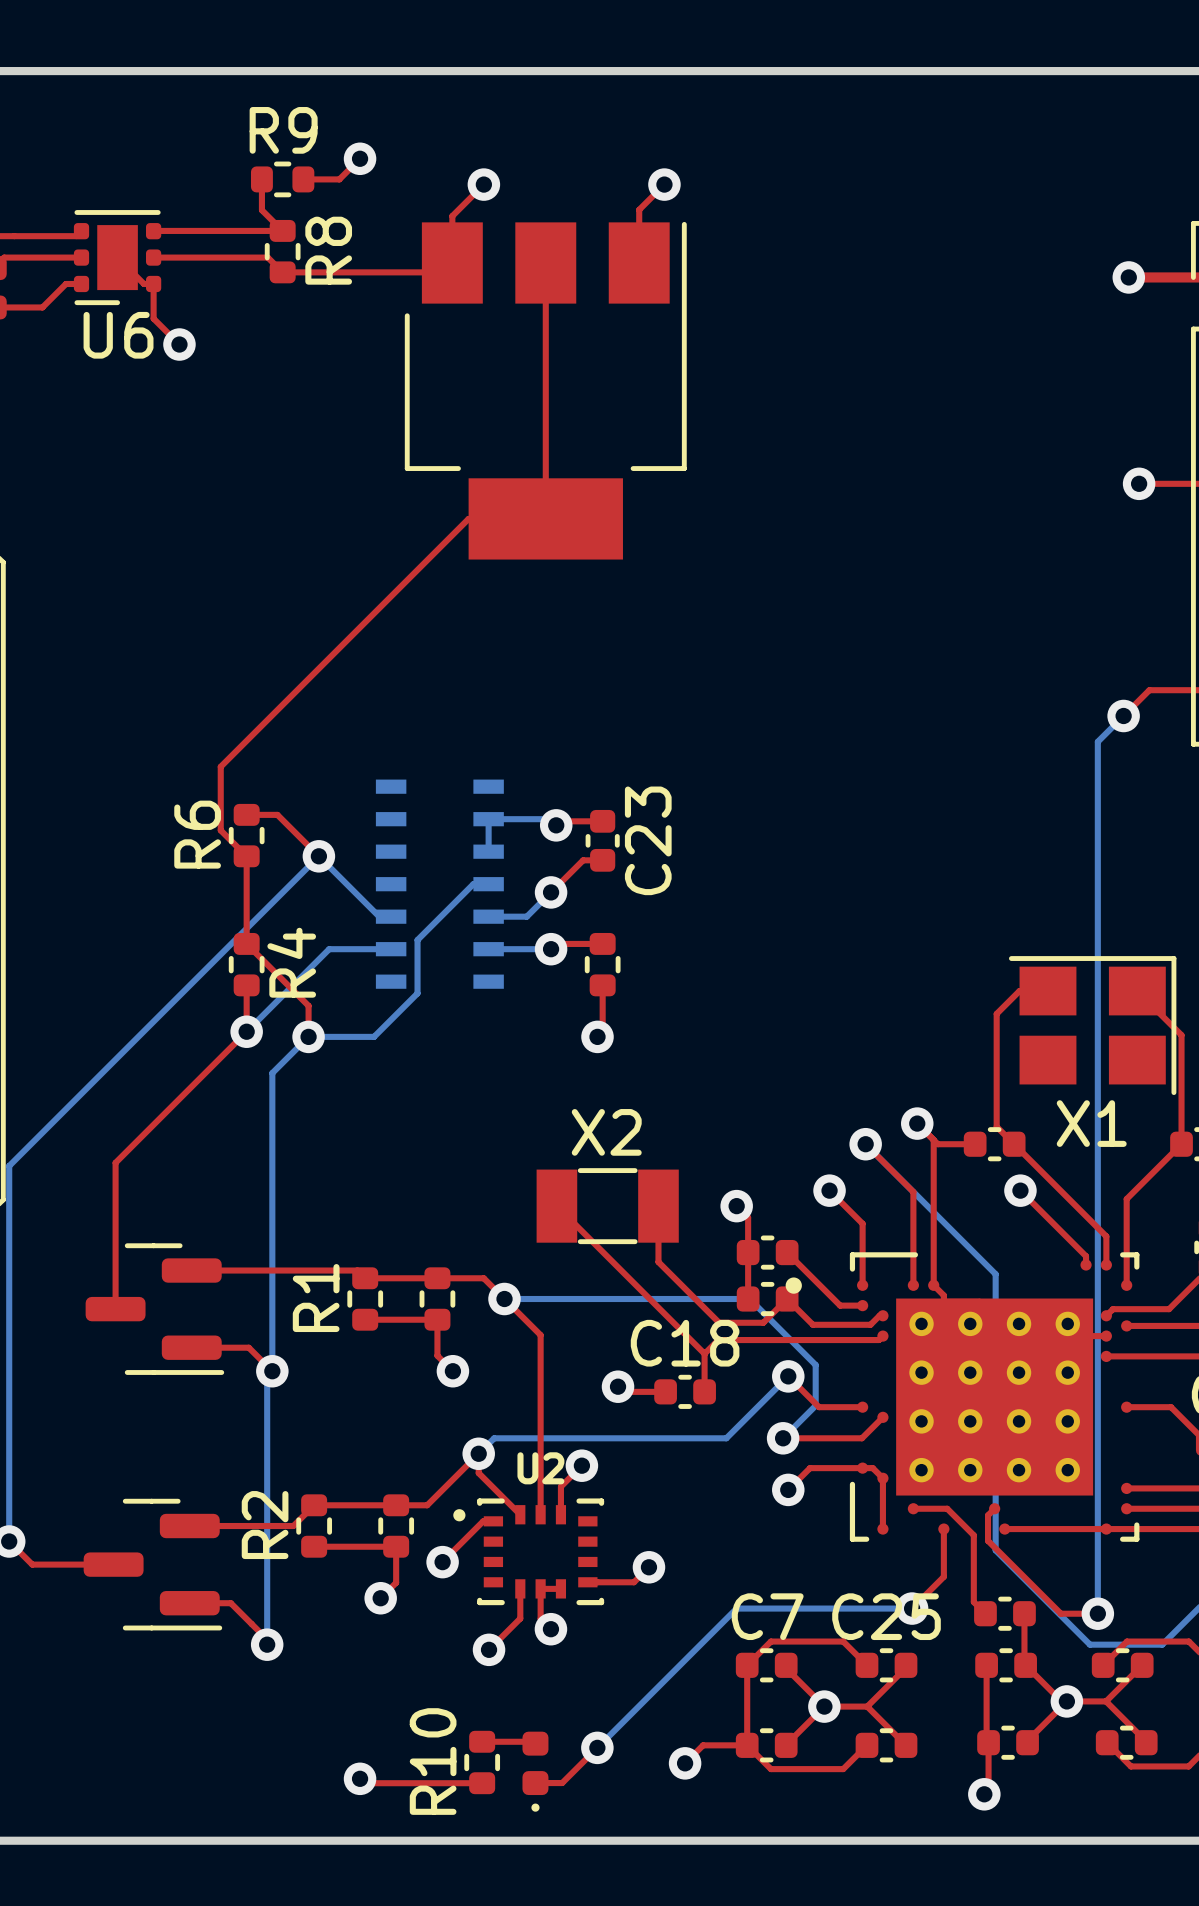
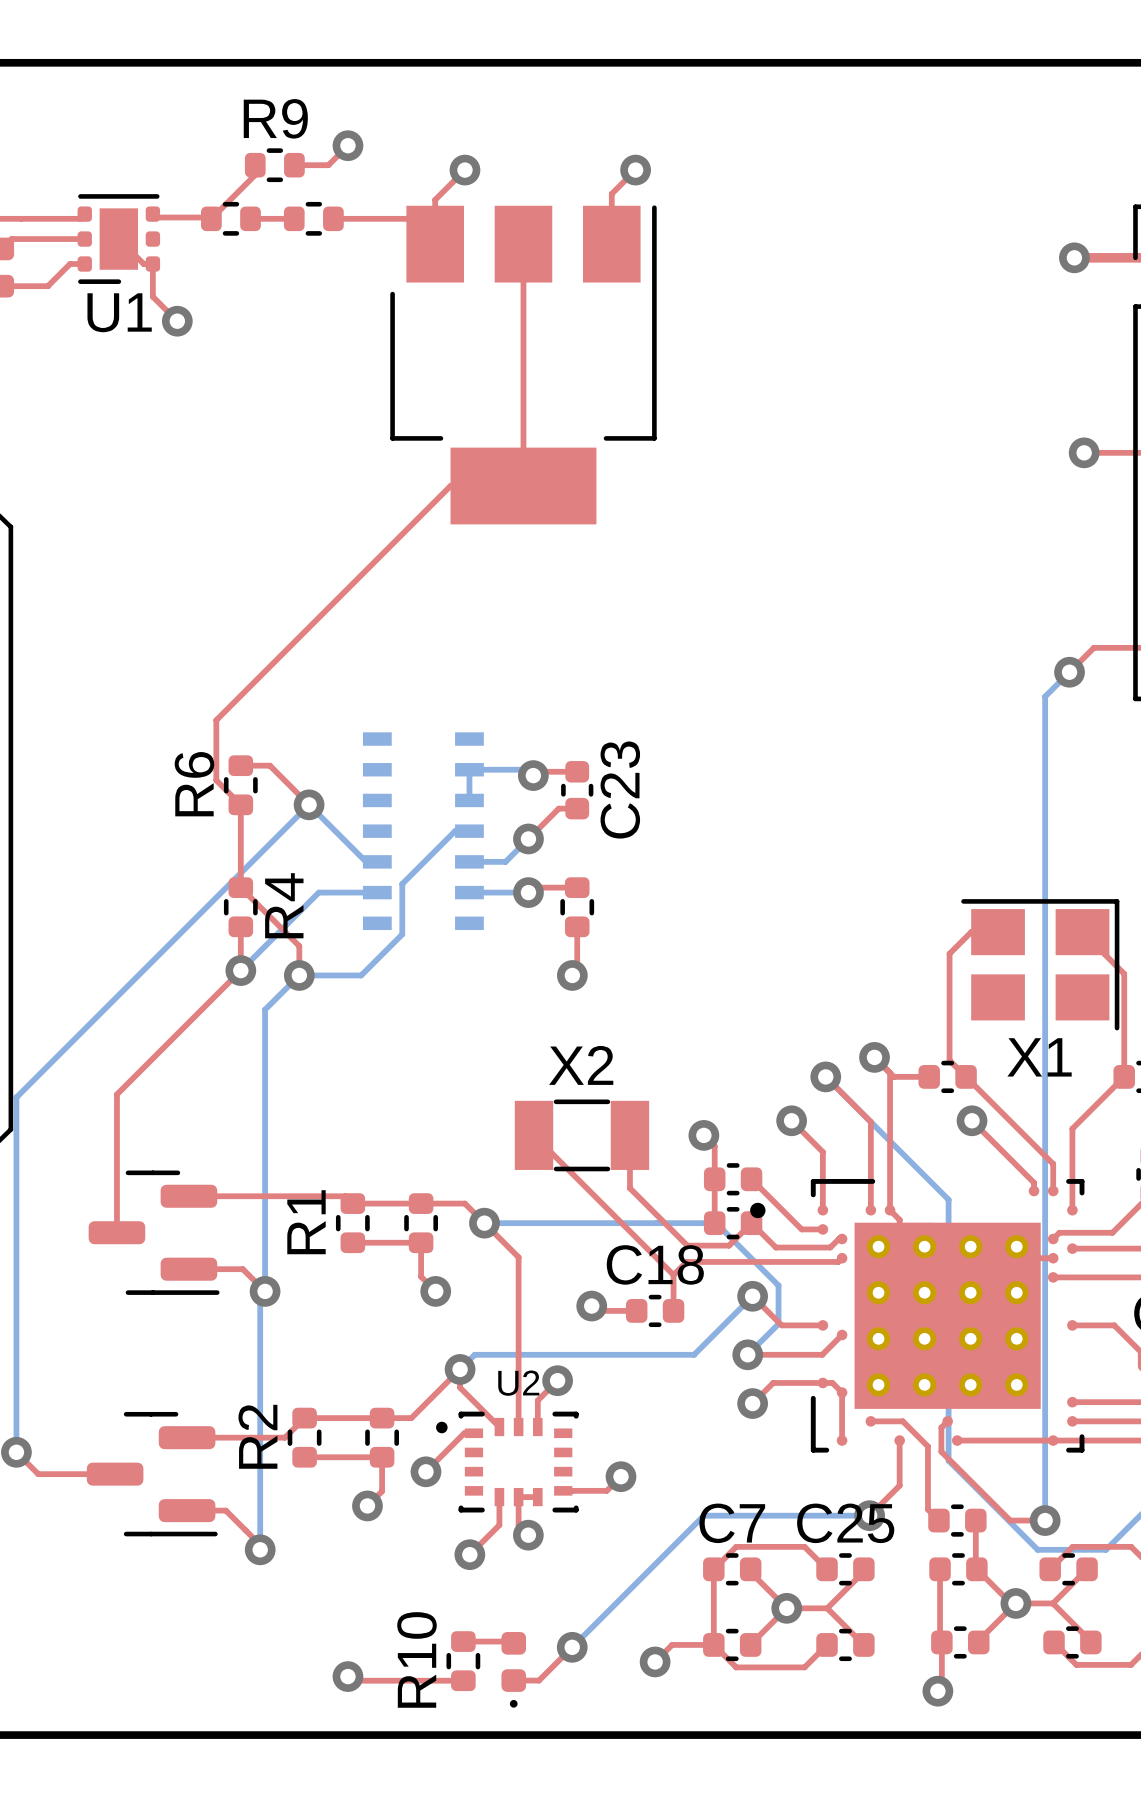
top track: (261, 189) (261, 210) (282, 230) (153, 230) -> (255, 174) (211, 218) (152, 217)
part: none -> (230, 218)
top track: none -> (250, 218) (294, 218)
part: none -> (313, 218)
top track: none -> (333, 218) (409, 218) (435, 244)
R8: (282, 251) -> none
top track: (153, 257) (267, 257) (282, 272) (442, 272) -> none
U6 name: U6 (118, 335) -> U1 (119, 312)

